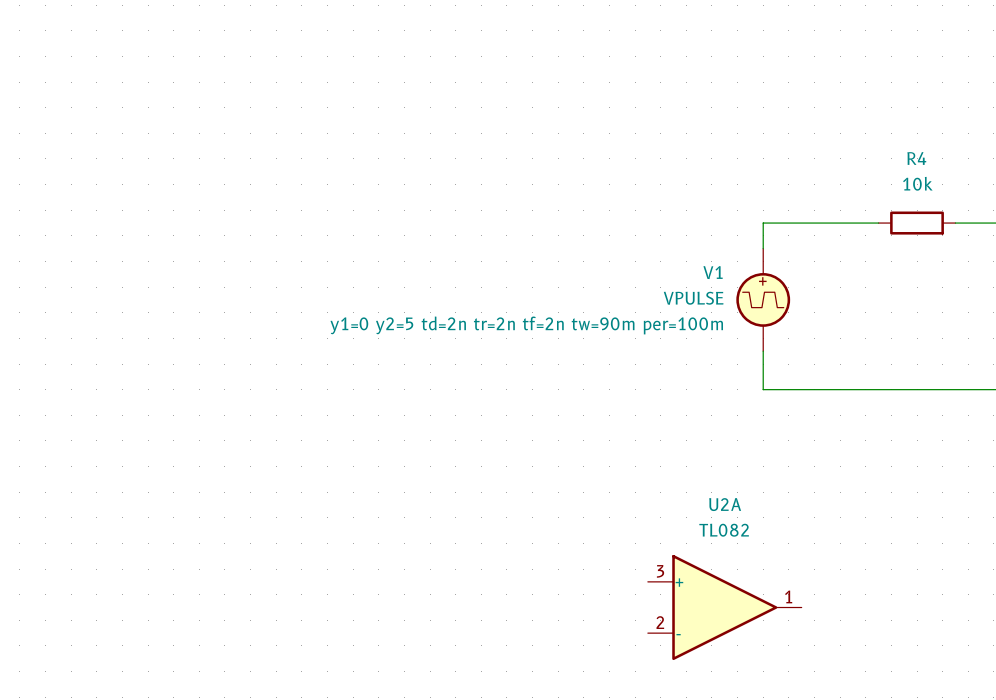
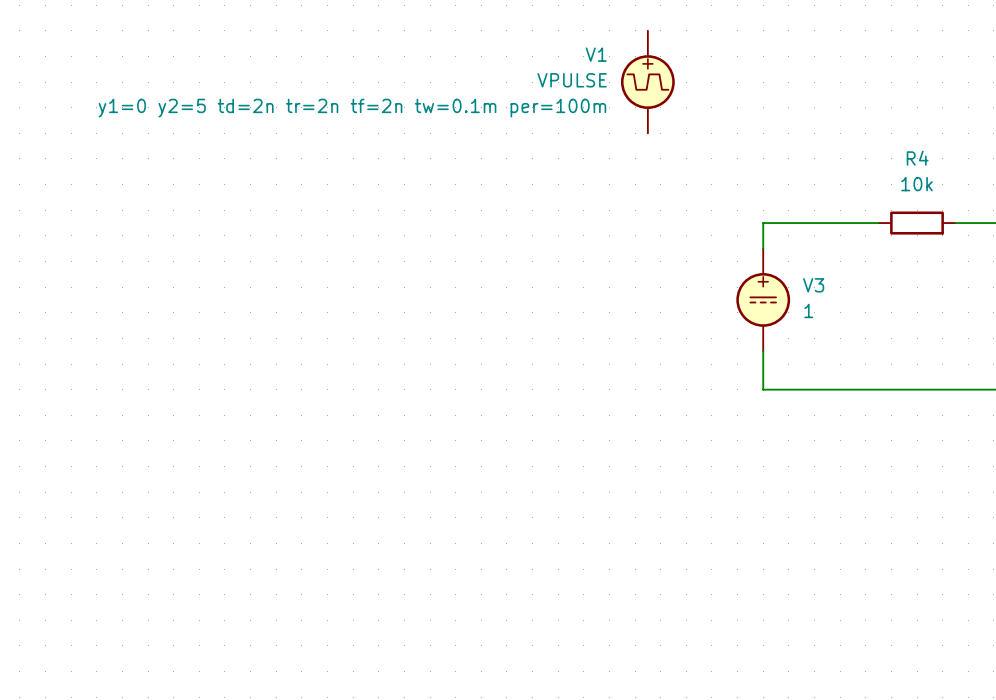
V1 position: (763, 299) -> (647, 82)
V3: none -> 1 (763, 299)
V1 text: y1=0 y2=5 td=2n tr=2n tf=2n tw=90m per=100m (526, 325) -> y1=0 y2=5 td=2n tr=2n tf=2n tw=0.1m per=100m (352, 108)
U2A: TL082 (724, 607) -> none

